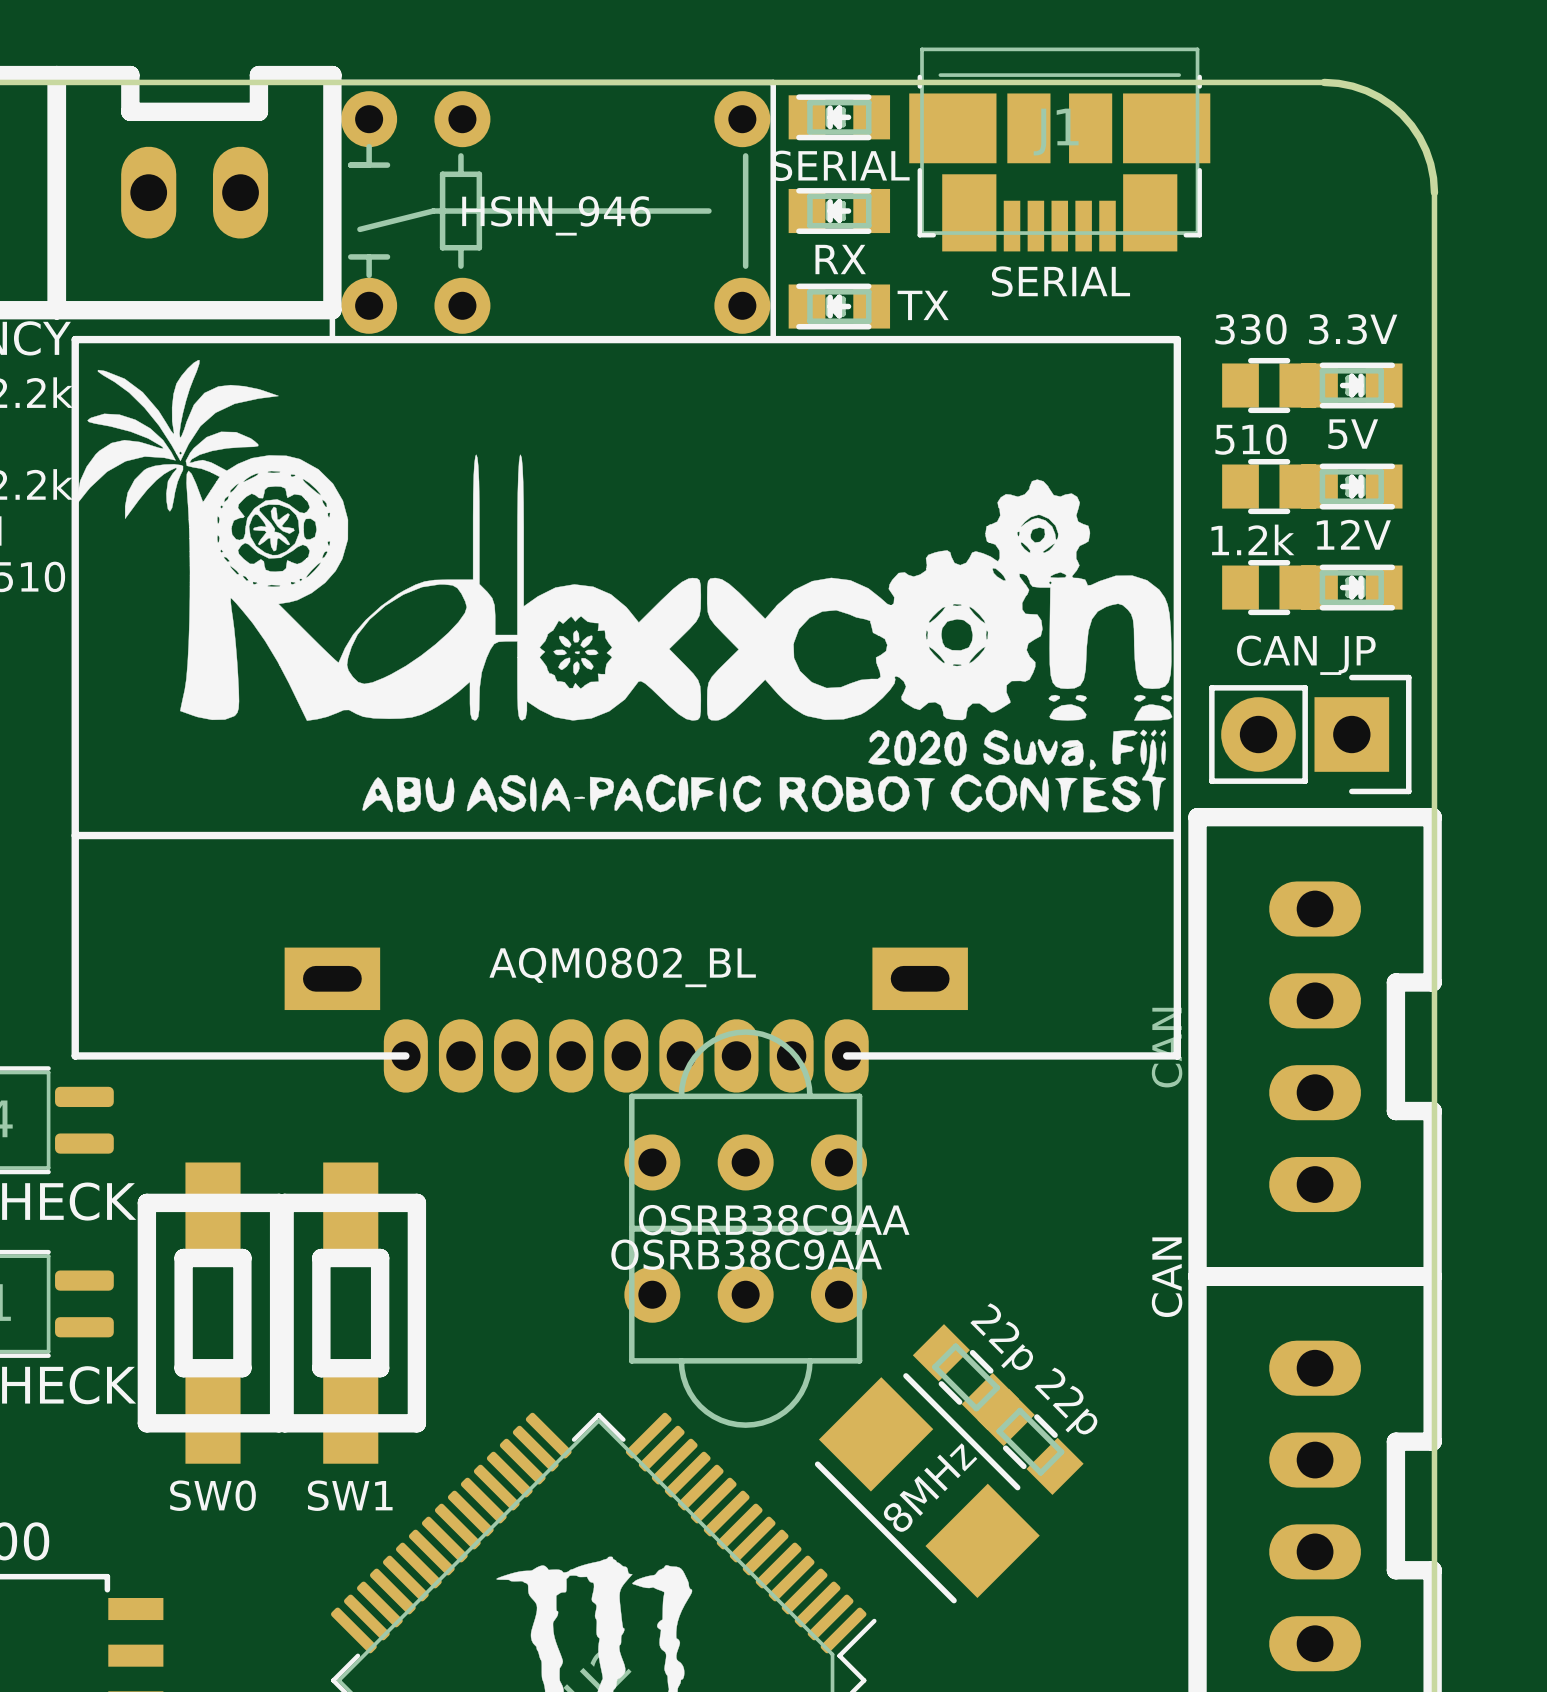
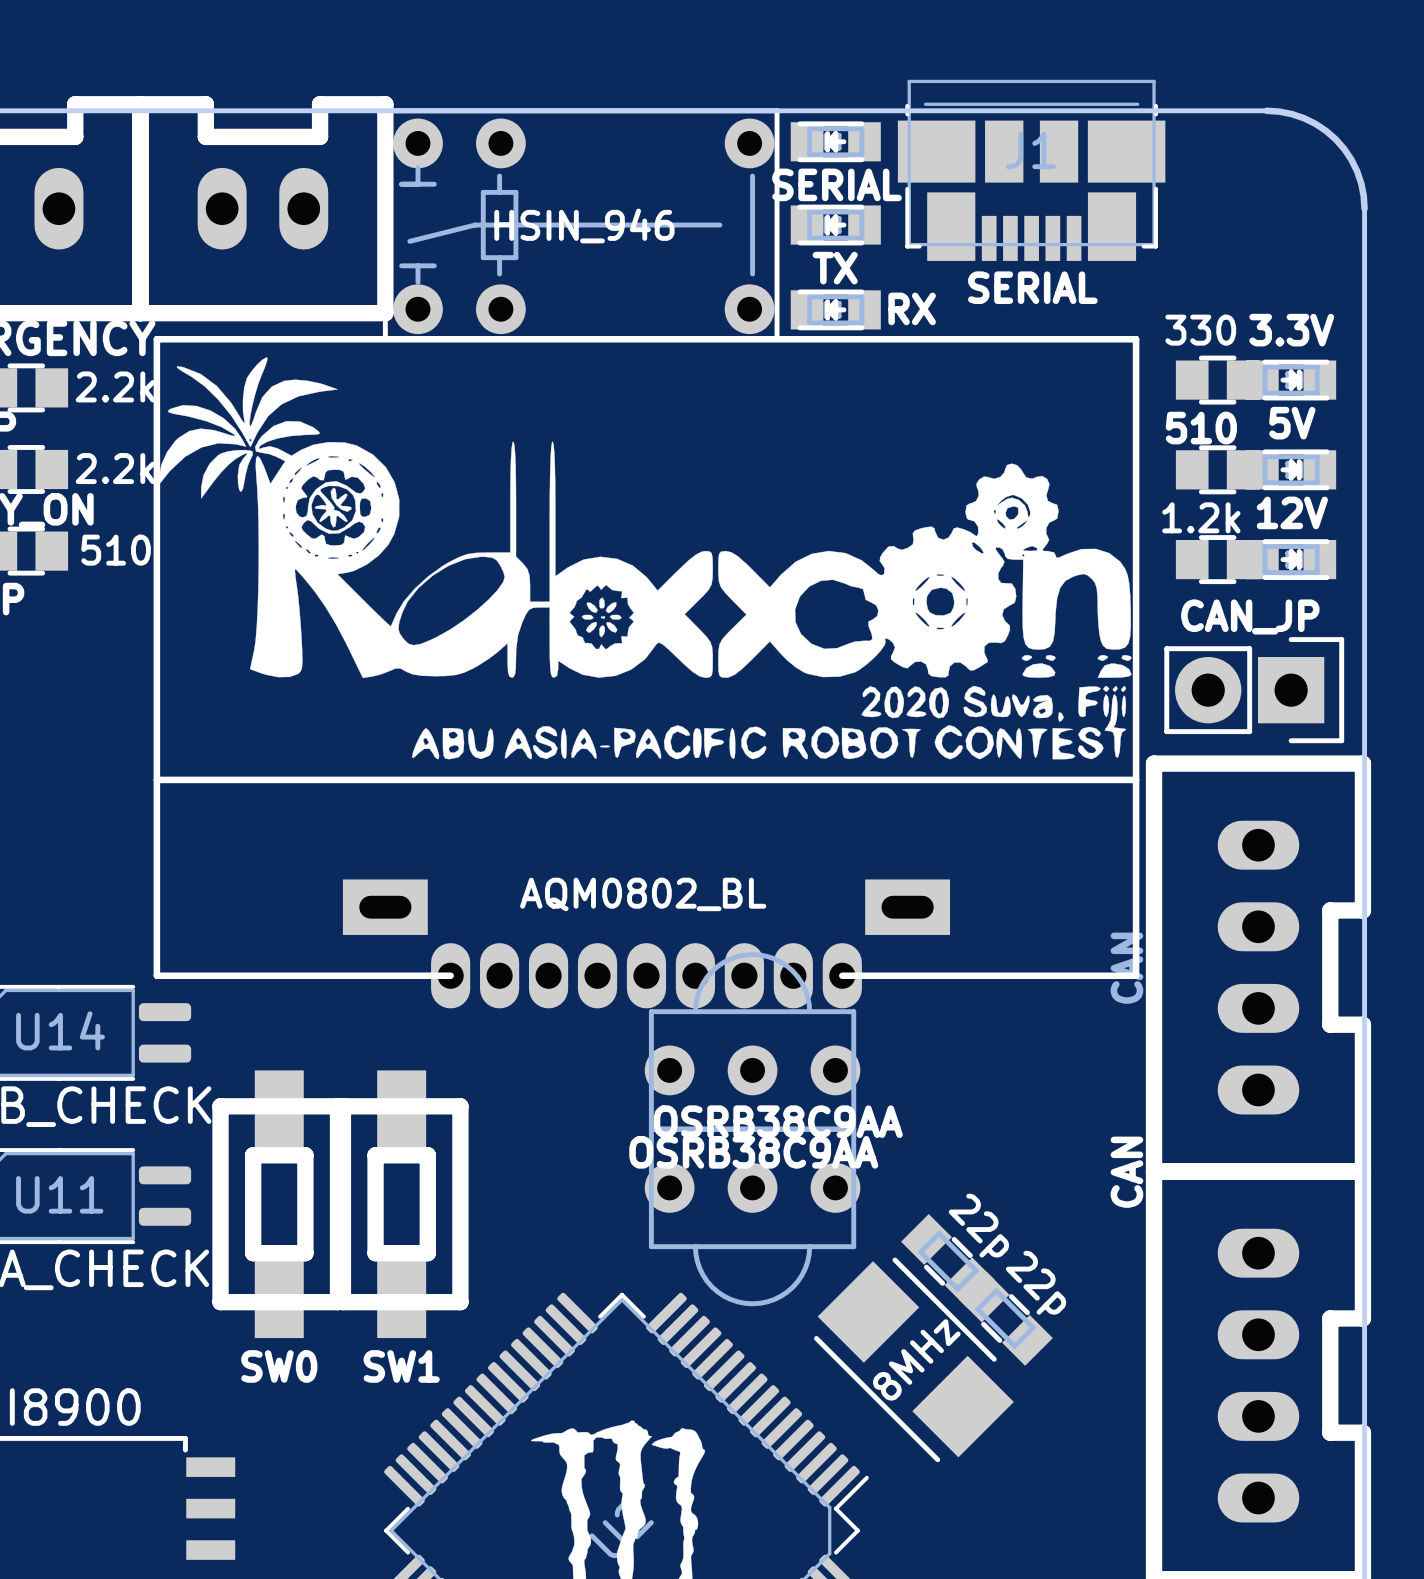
part value: RX (840, 259) -> TX (835, 268)
part value: TX (923, 305) -> RX (912, 308)

